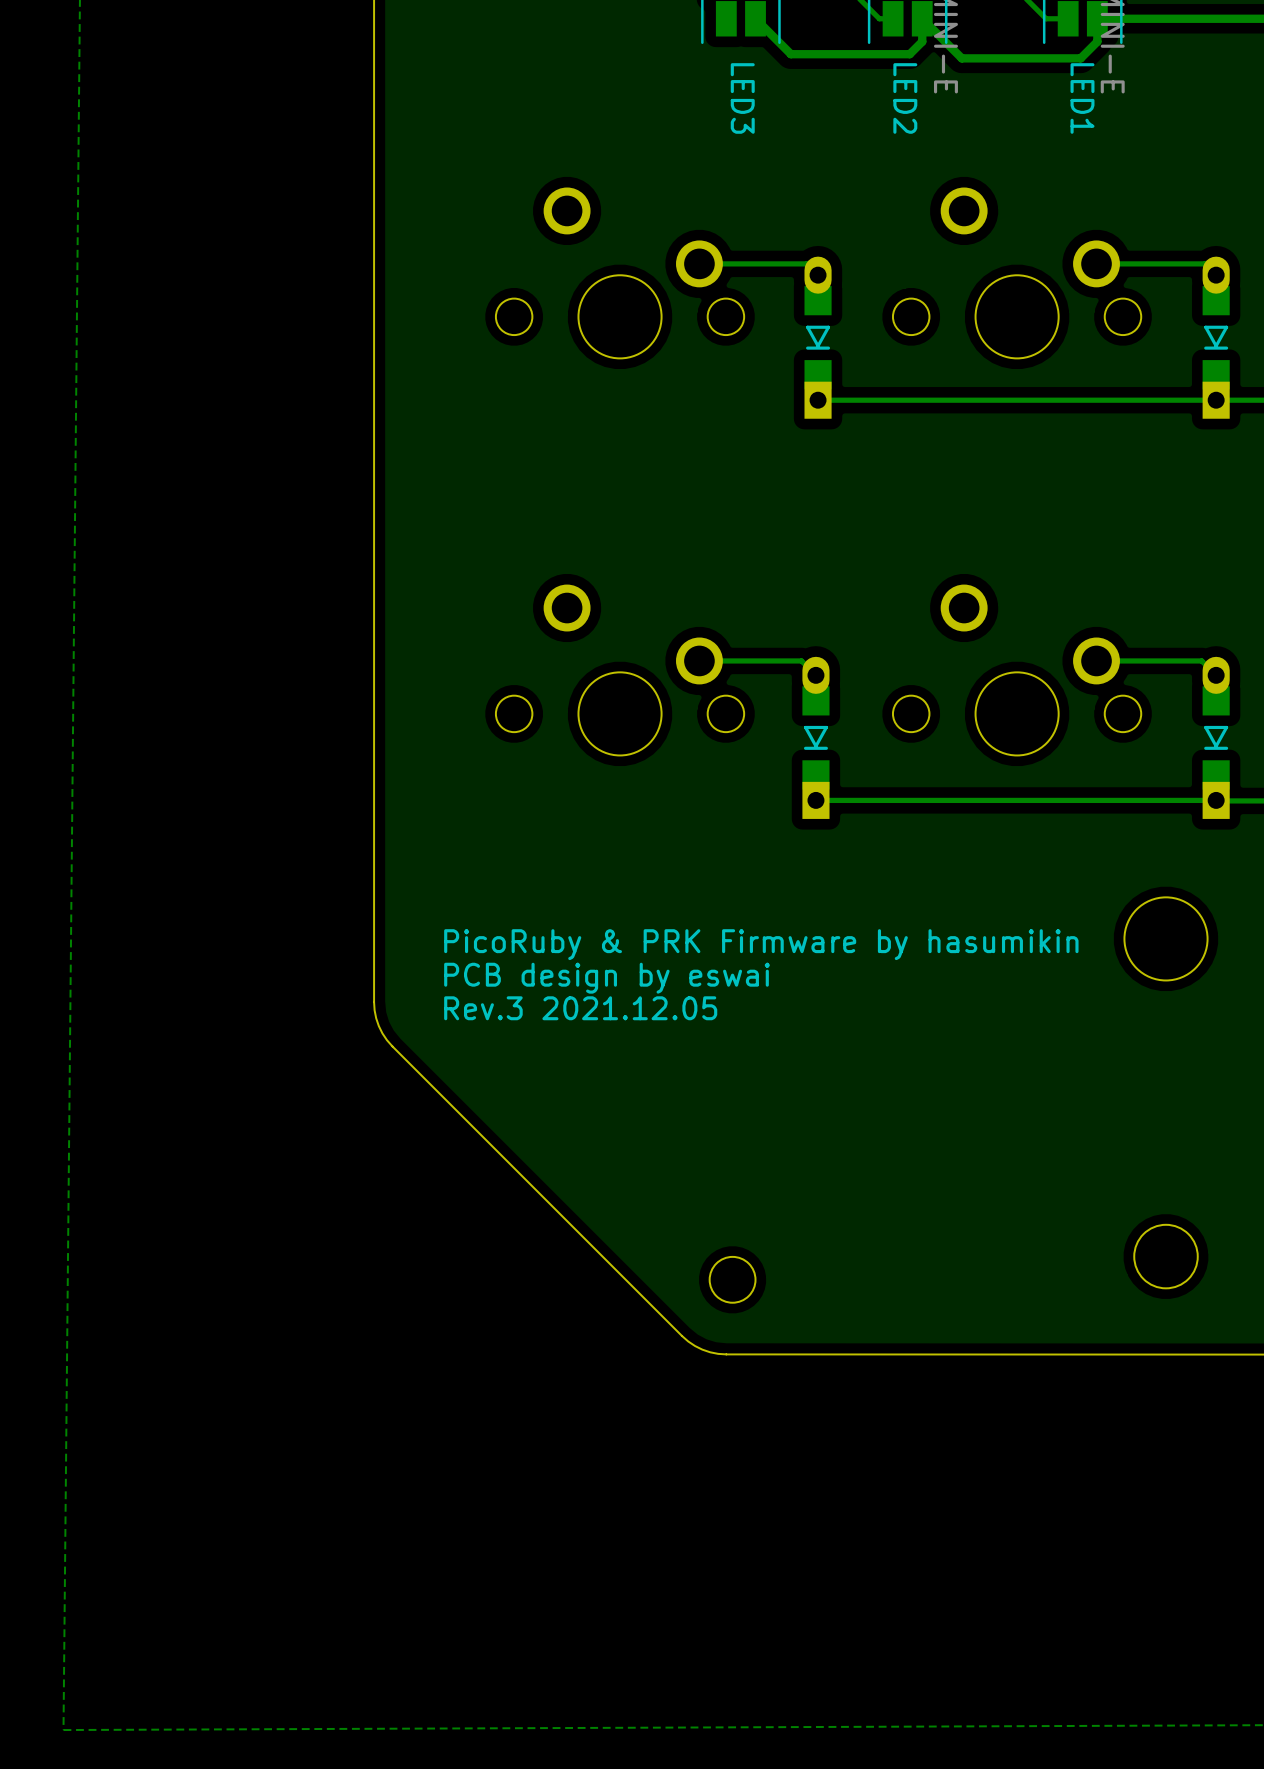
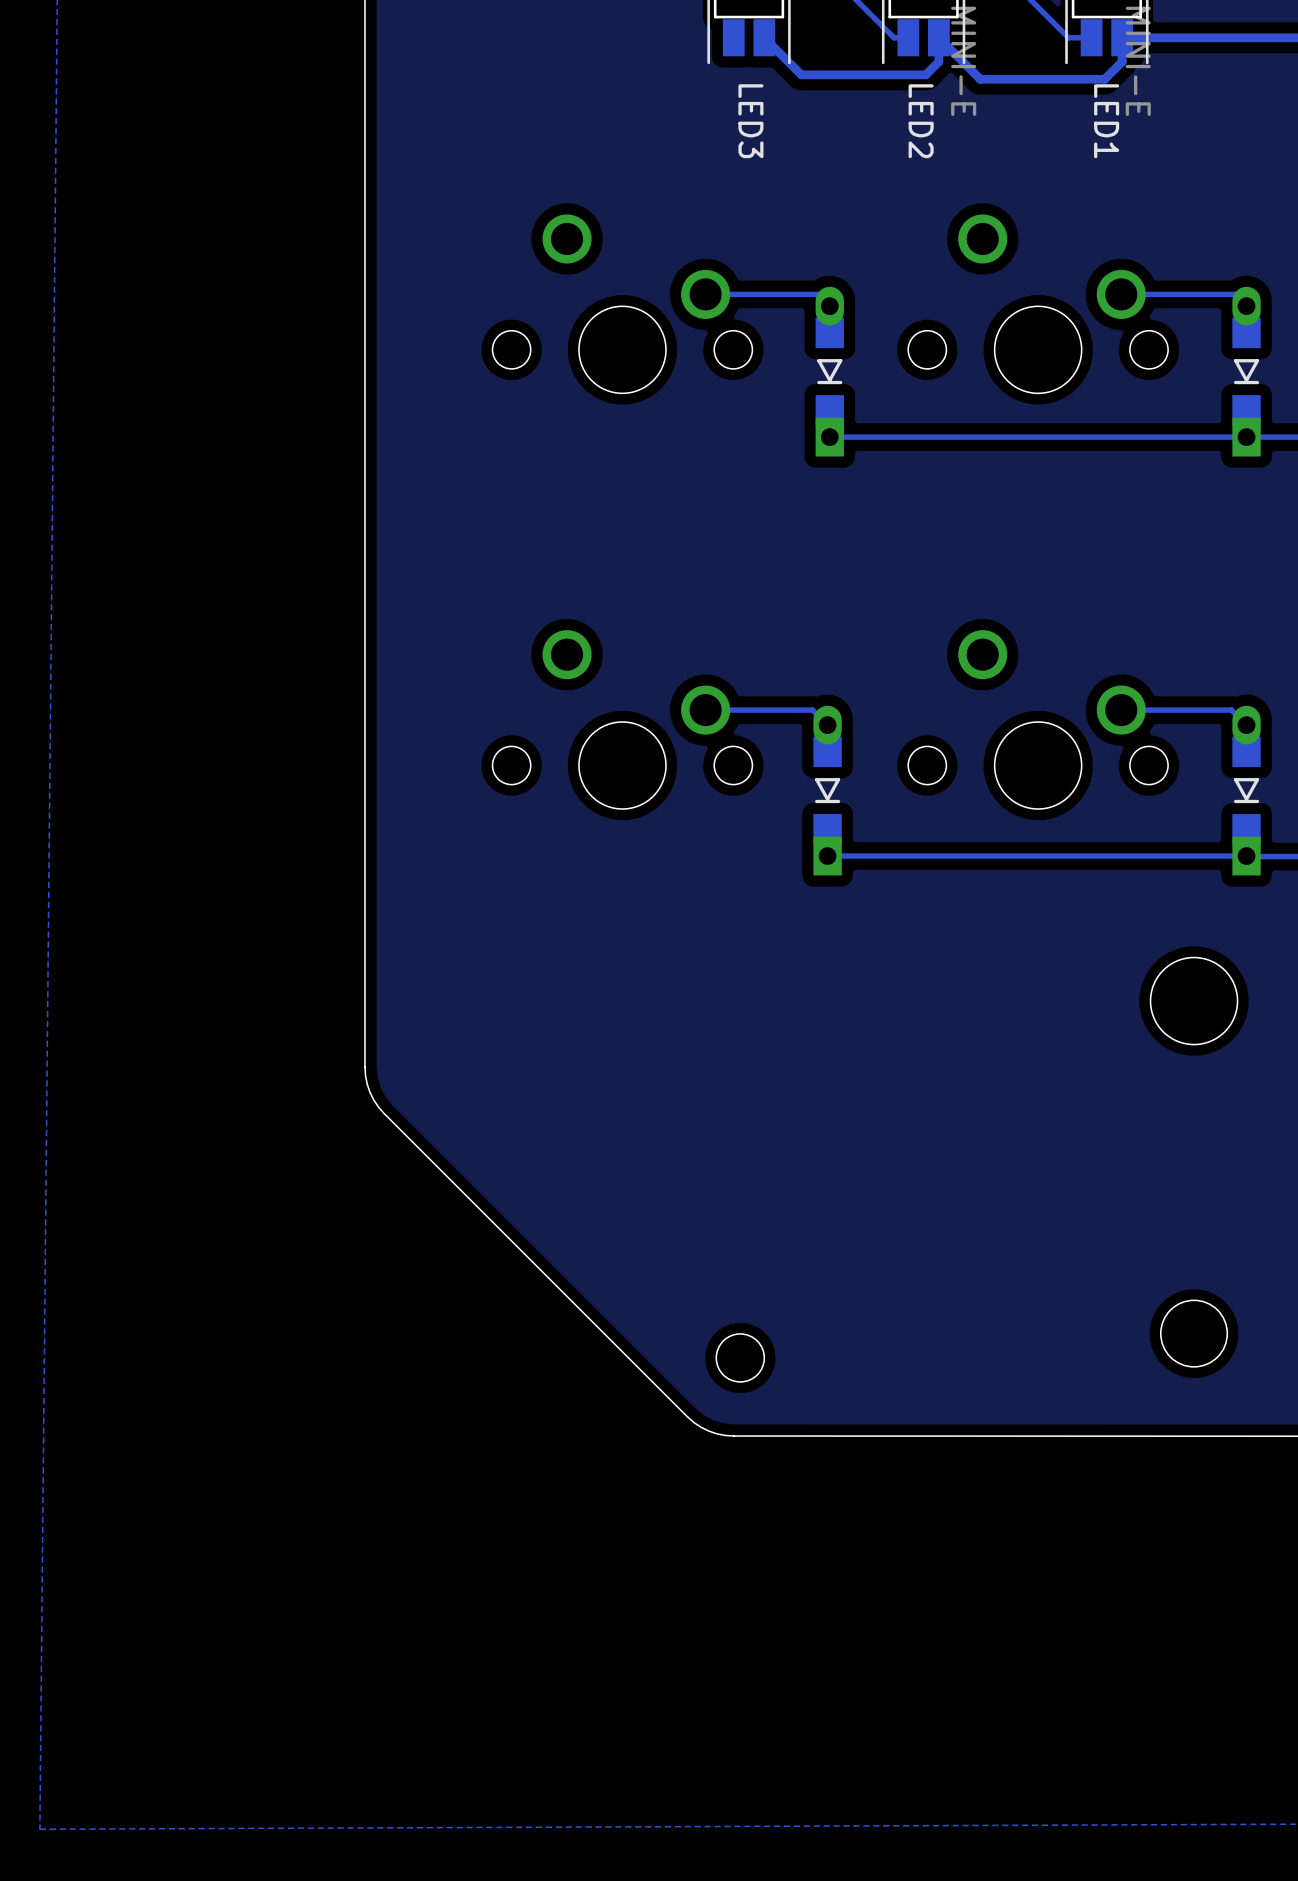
text: PicoRuby & PRK Firmware by hasumikin (761, 944) -> none
text: PCB design by eswai (607, 978) -> none
text: Rev.3 2021.12.05 (580, 1008) -> none

